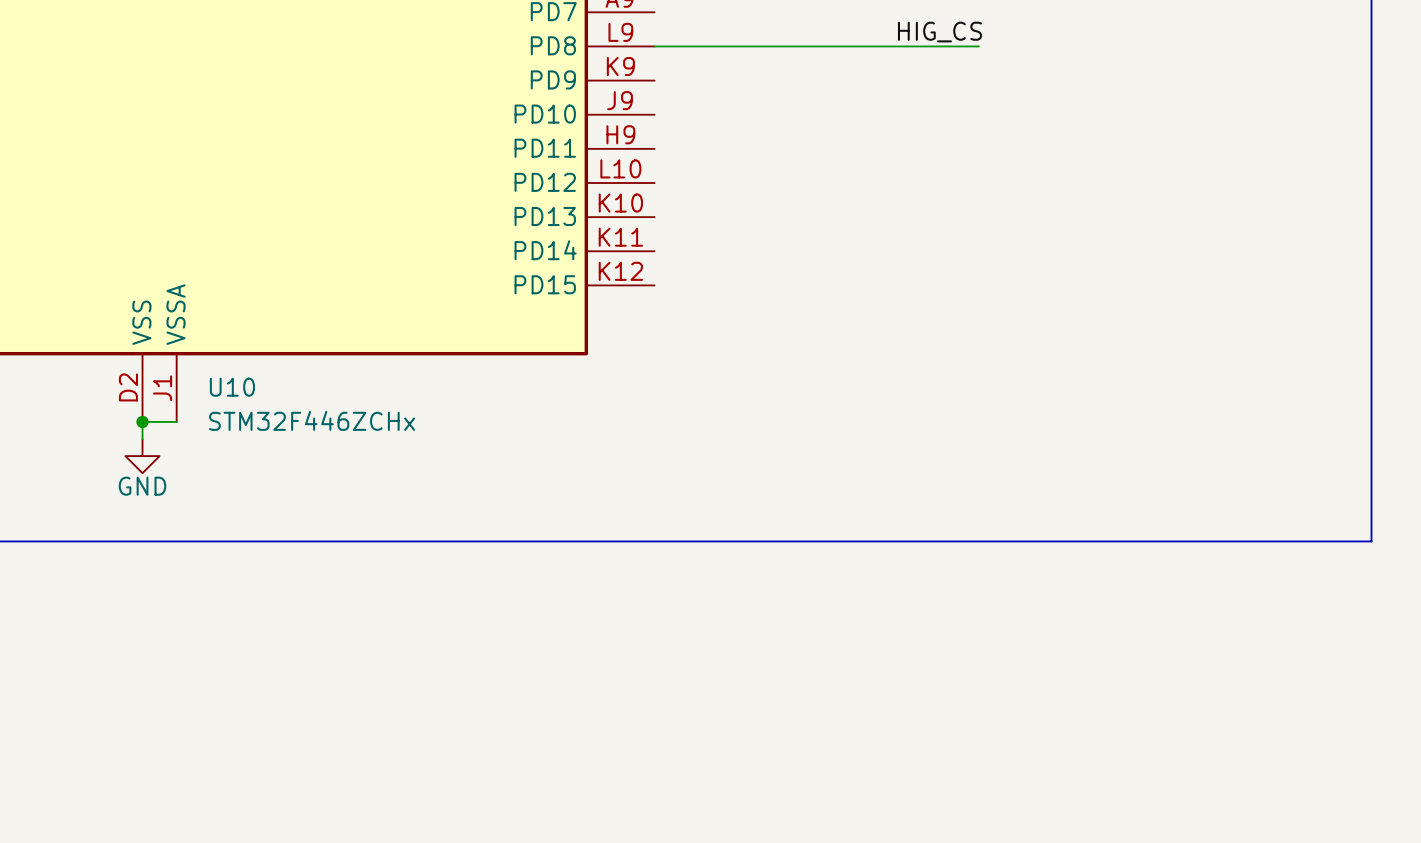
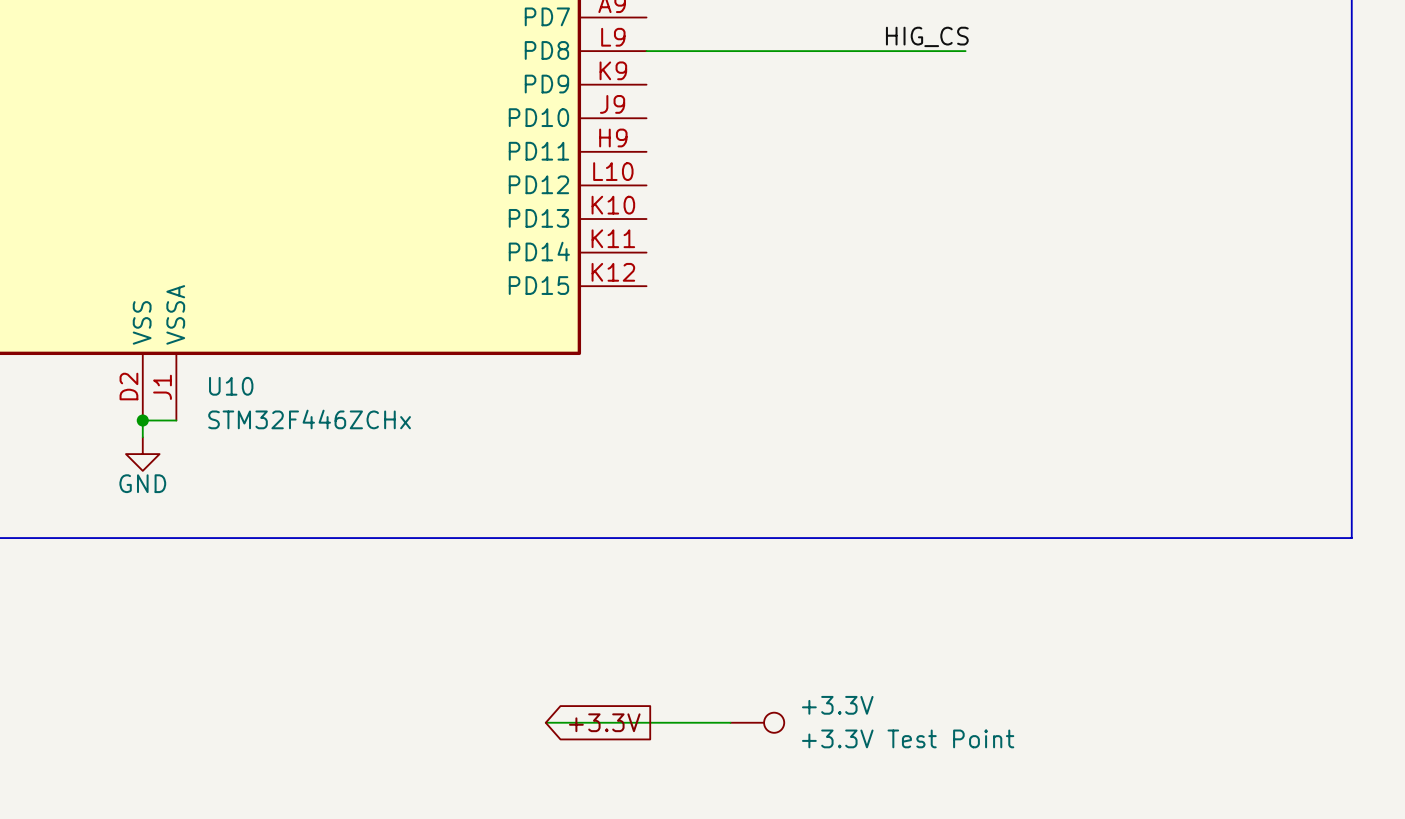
wire: none -> (545, 722) (730, 722)
global label: none -> +3.3V (604, 722)
+3.3V: none -> +3.3V Test Point (757, 722)

